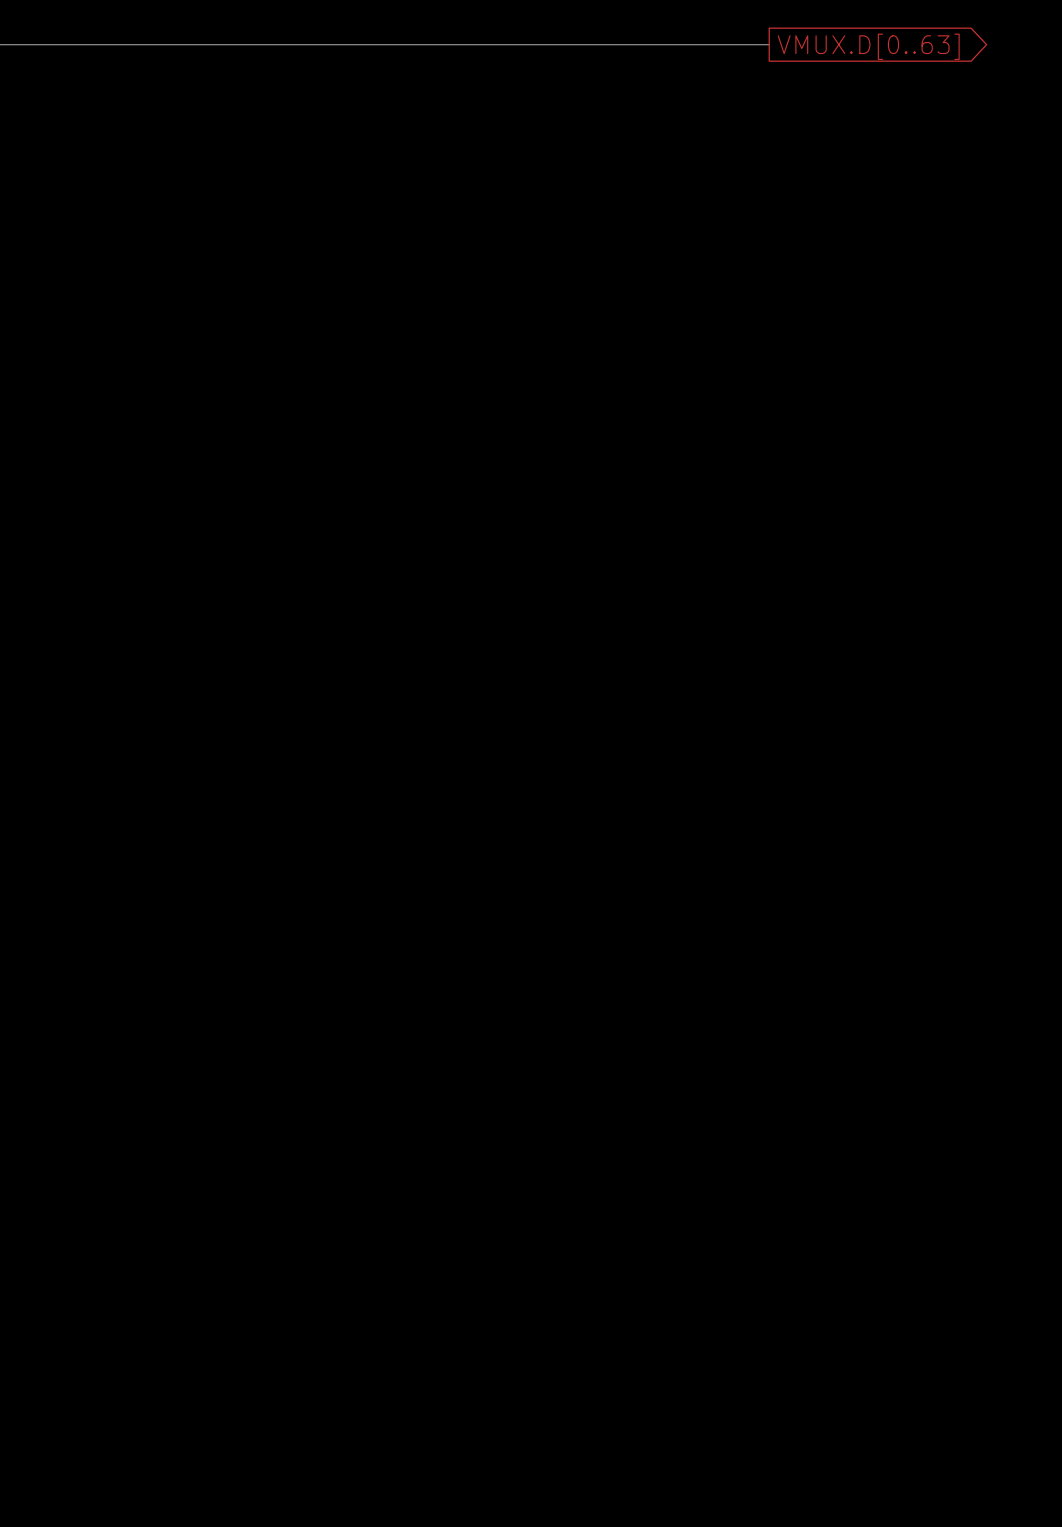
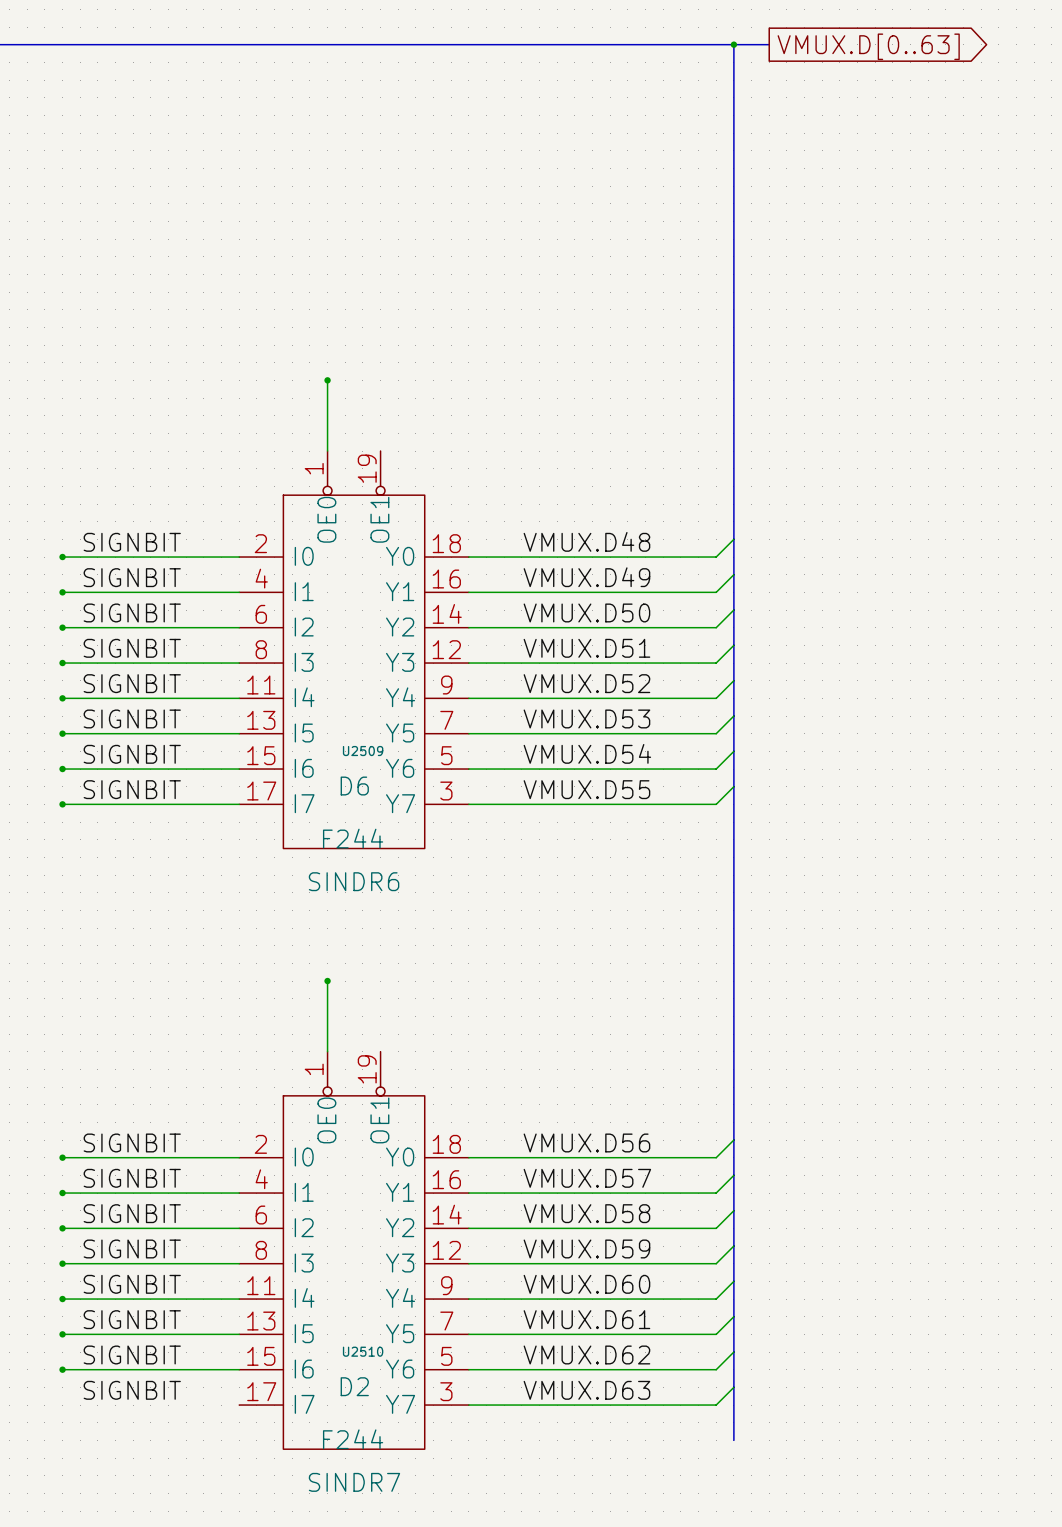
bus: none -> (733, 44) (733, 1440)
junction: none -> (733, 44)
wire: none -> (327, 380) (327, 451)
junction: none -> (327, 380)
wire: none -> (733, 539) (716, 557) (468, 557)
label: none -> VMUX.D48 (586, 541)
label: none -> SIGNBIT (132, 542)
wire: none -> (62, 557) (239, 557)
junction: none -> (62, 557)
wire: none -> (733, 574) (716, 592) (468, 592)
label: none -> SIGNBIT (132, 577)
label: none -> VMUX.D49 (586, 577)
wire: none -> (62, 592) (239, 592)
junction: none -> (62, 592)
wire: none -> (733, 610) (716, 627) (468, 627)
label: none -> SIGNBIT (132, 612)
label: none -> VMUX.D50 (586, 612)
wire: none -> (62, 627) (239, 627)
junction: none -> (62, 627)
wire: none -> (733, 645) (716, 663) (468, 663)
label: none -> SIGNBIT (132, 648)
label: none -> VMUX.D51 (586, 648)
U2509: none -> F244 (354, 649)
wire: none -> (62, 663) (239, 663)
junction: none -> (62, 663)
wire: none -> (733, 680) (716, 698) (468, 698)
label: none -> SIGNBIT (132, 683)
label: none -> VMUX.D52 (586, 683)
wire: none -> (62, 698) (239, 698)
junction: none -> (62, 698)
wire: none -> (733, 716) (716, 733) (468, 733)
label: none -> SIGNBIT (132, 718)
label: none -> VMUX.D53 (586, 718)
wire: none -> (62, 733) (239, 733)
junction: none -> (62, 733)
wire: none -> (733, 751) (716, 769) (468, 769)
label: none -> VMUX.D54 (587, 753)
label: none -> SIGNBIT (132, 754)
wire: none -> (62, 769) (239, 769)
junction: none -> (62, 769)
wire: none -> (733, 786) (716, 804) (468, 804)
label: none -> SIGNBIT (132, 789)
label: none -> VMUX.D55 (586, 789)
wire: none -> (62, 804) (239, 804)
junction: none -> (62, 804)
wire: none -> (327, 981) (327, 1051)
junction: none -> (327, 981)
wire: none -> (733, 1140) (716, 1157) (468, 1157)
label: none -> SIGNBIT (132, 1142)
label: none -> VMUX.D56 (586, 1142)
wire: none -> (62, 1157) (239, 1157)
junction: none -> (62, 1157)
wire: none -> (733, 1175) (716, 1193) (468, 1193)
label: none -> SIGNBIT (132, 1178)
label: none -> VMUX.D57 (587, 1178)
wire: none -> (62, 1193) (239, 1193)
junction: none -> (62, 1193)
wire: none -> (733, 1210) (716, 1228) (468, 1228)
label: none -> SIGNBIT (132, 1213)
label: none -> VMUX.D58 (586, 1213)
wire: none -> (62, 1228) (239, 1228)
junction: none -> (62, 1228)
wire: none -> (733, 1246) (716, 1263) (468, 1263)
label: none -> SIGNBIT (132, 1248)
label: none -> VMUX.D59 (586, 1248)
U2510: none -> F244 (354, 1250)
wire: none -> (62, 1263) (239, 1263)
junction: none -> (62, 1263)
wire: none -> (733, 1281) (716, 1299) (468, 1299)
label: none -> SIGNBIT (132, 1284)
label: none -> VMUX.D60 (586, 1284)
wire: none -> (62, 1299) (239, 1299)
junction: none -> (62, 1299)
wire: none -> (733, 1316) (716, 1334) (468, 1334)
label: none -> SIGNBIT (132, 1319)
label: none -> VMUX.D61 (586, 1319)
wire: none -> (62, 1334) (239, 1334)
junction: none -> (62, 1334)
wire: none -> (733, 1352) (716, 1369) (468, 1369)
label: none -> SIGNBIT (132, 1354)
label: none -> VMUX.D62 (586, 1354)
wire: none -> (62, 1369) (239, 1369)
junction: none -> (62, 1369)
wire: none -> (733, 1387) (716, 1405) (468, 1405)
label: none -> SIGNBIT (132, 1390)
label: none -> VMUX.D63 (586, 1390)

